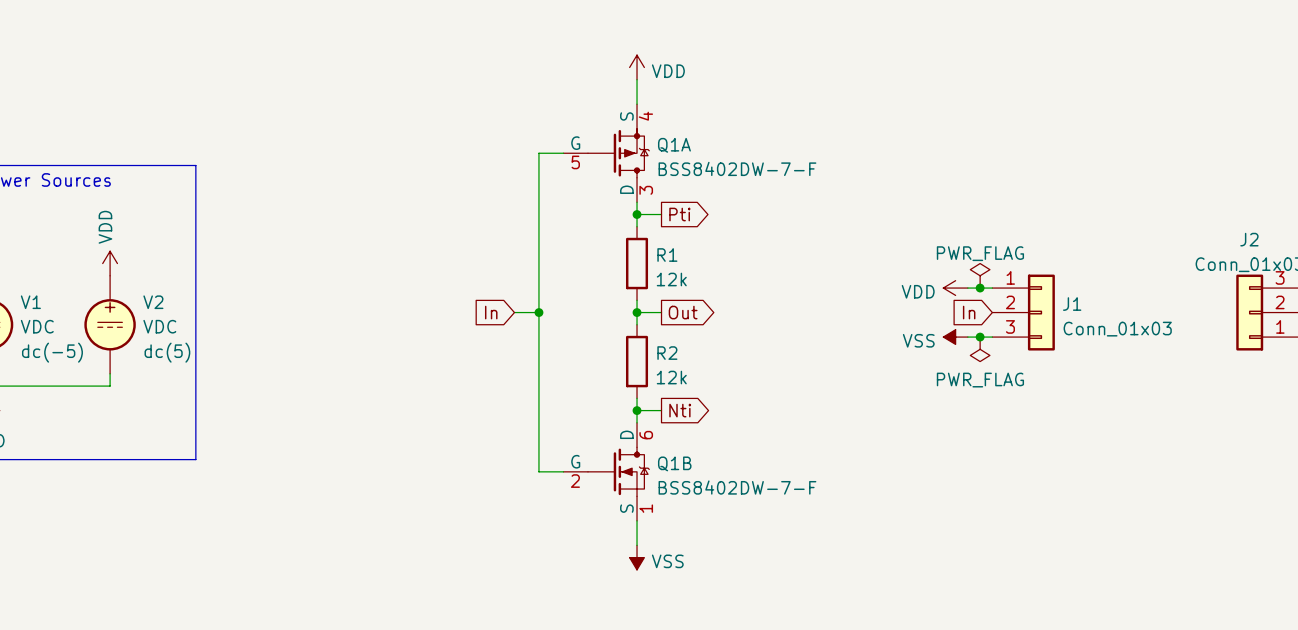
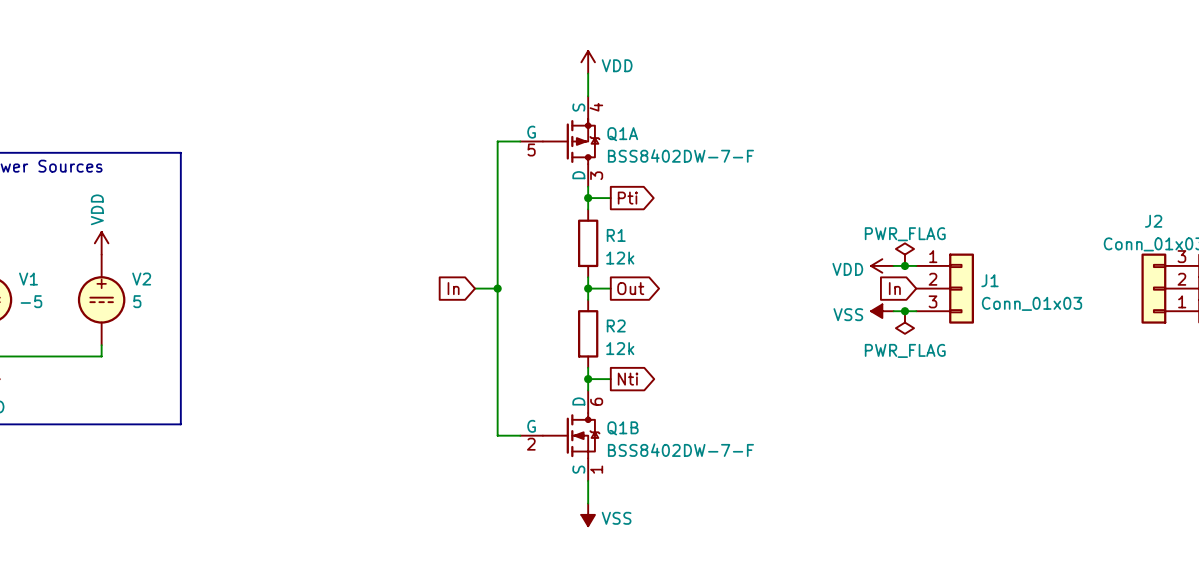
V1 value: VDC (37, 326) -> -5 (31, 301)
V2 value: VDC (159, 326) -> 5 (137, 301)
V1 text: dc(-5) (52, 352) -> none
V2 text: dc(5) (167, 352) -> none

